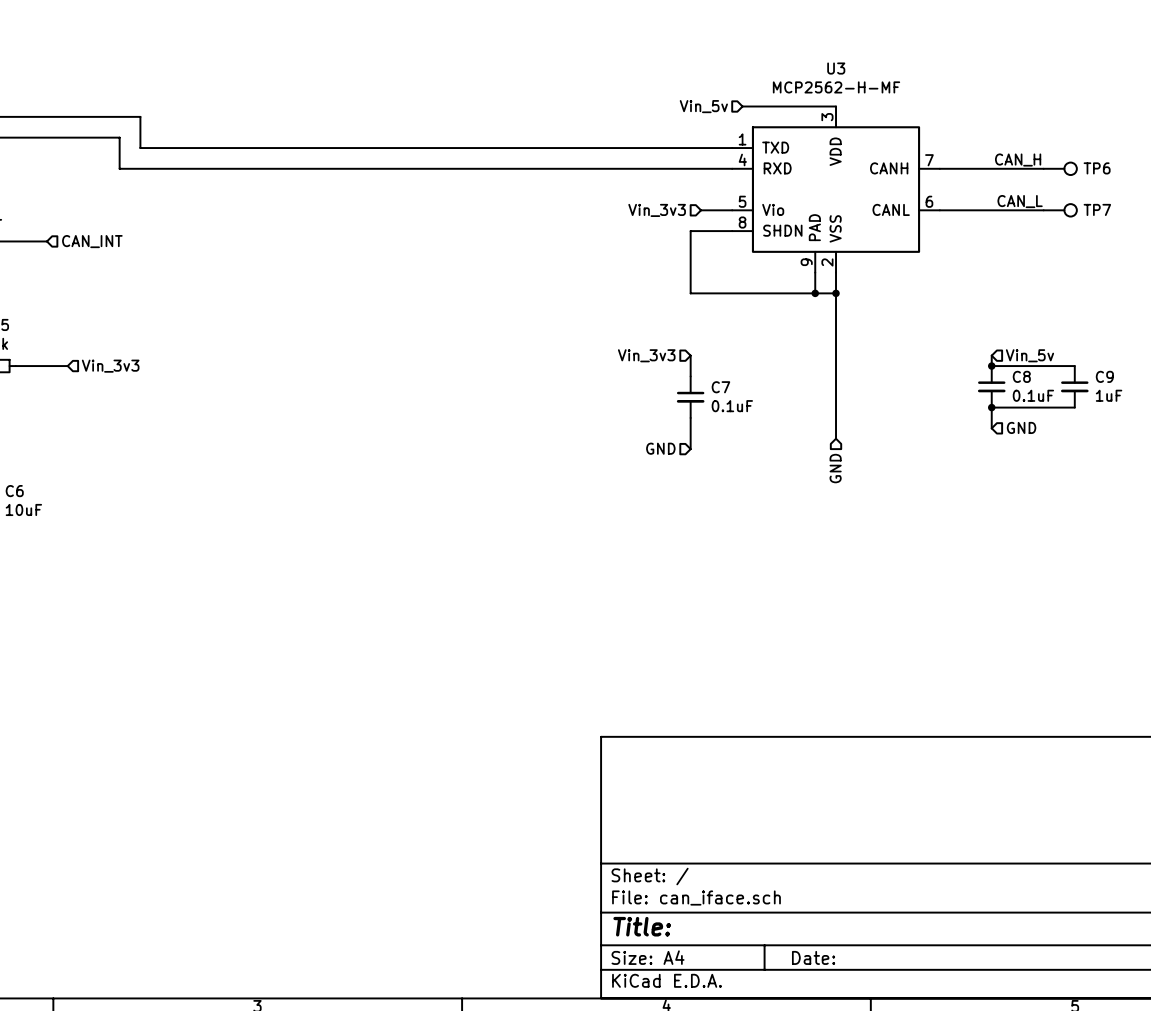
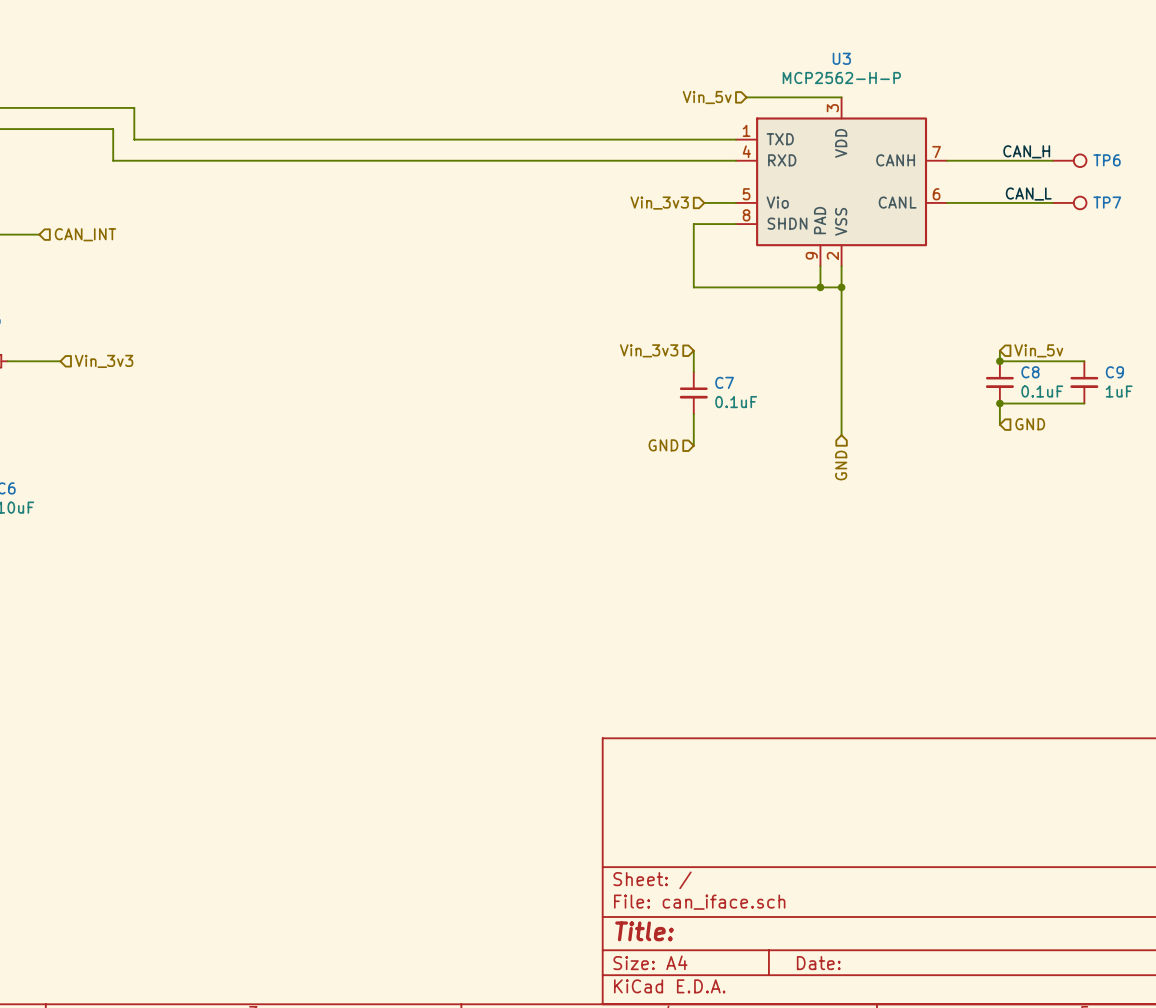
U3 value: MCP2562-H-MF (836, 87) -> MCP2562-H-P (841, 78)

